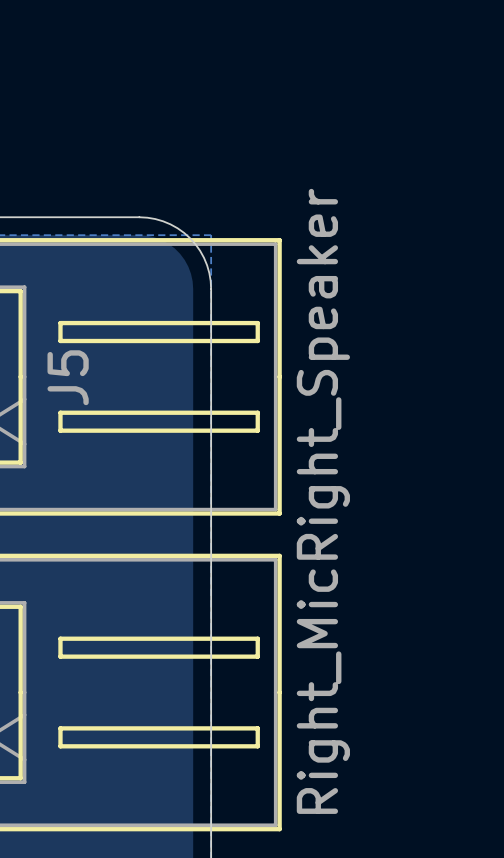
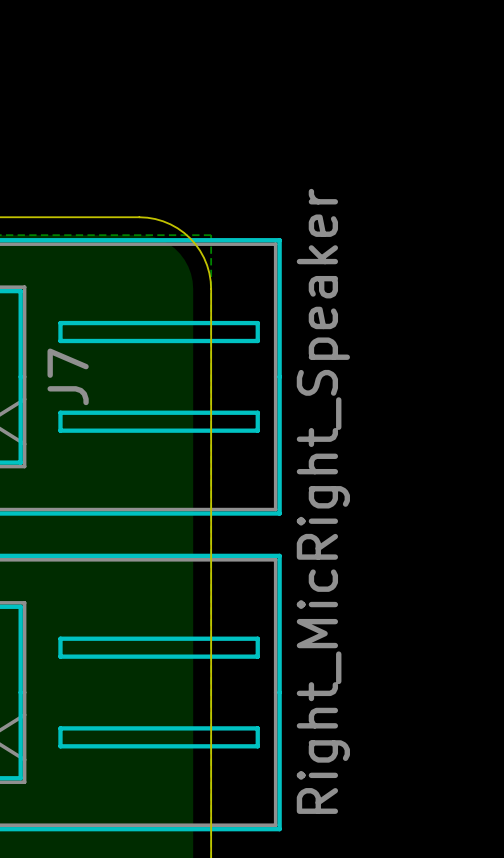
J5 name: J5 (68, 377) -> J7 (68, 376)

